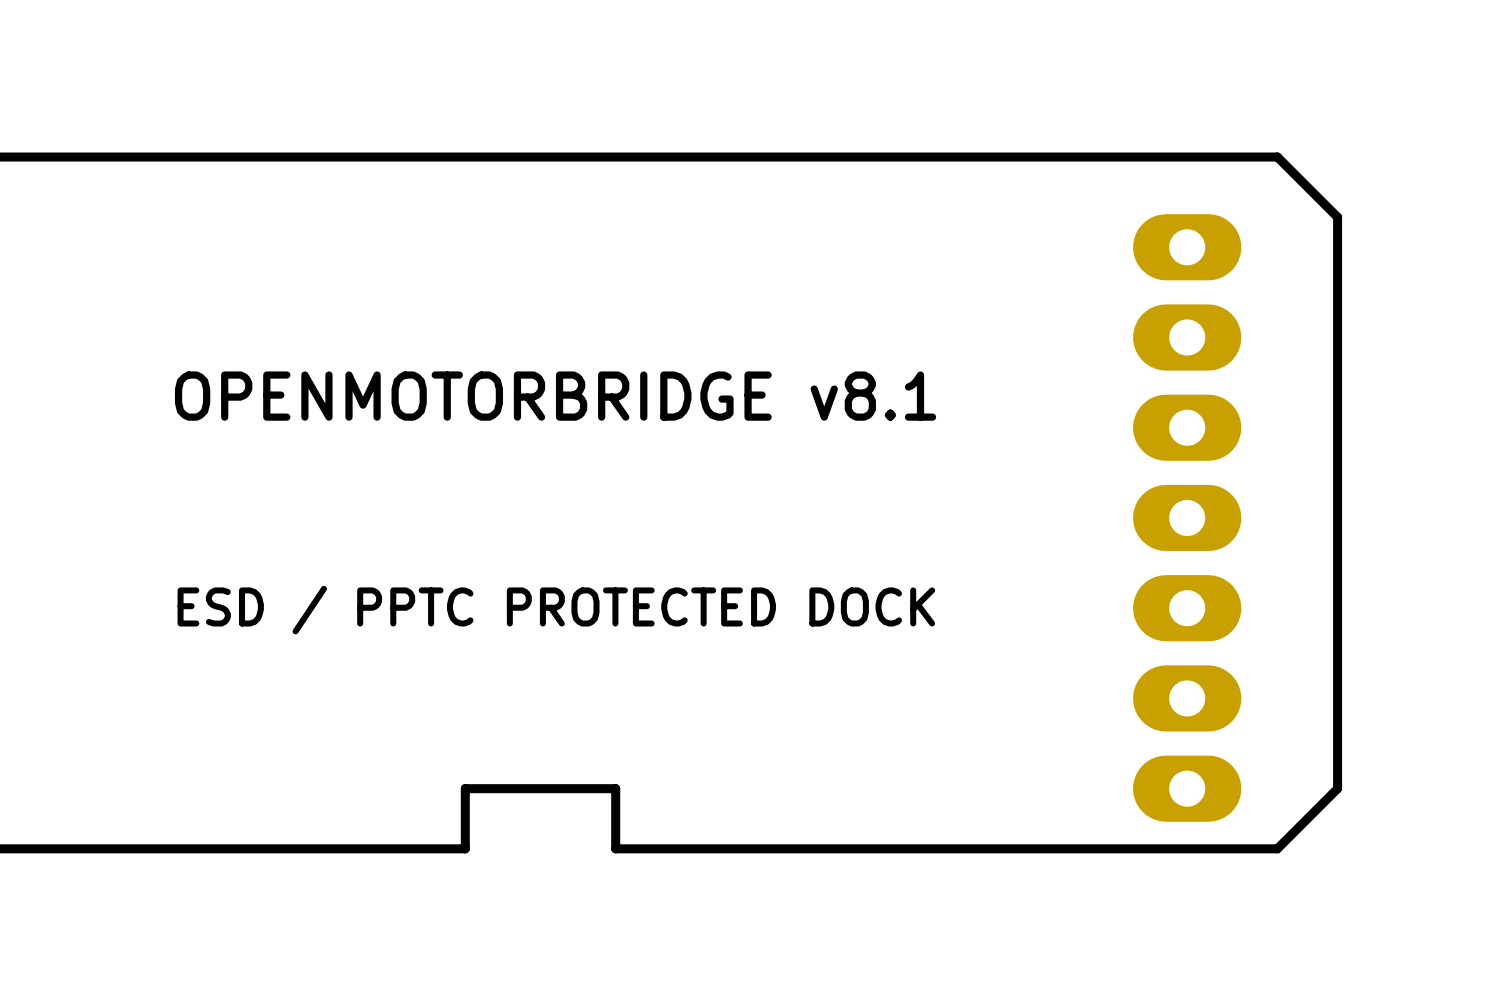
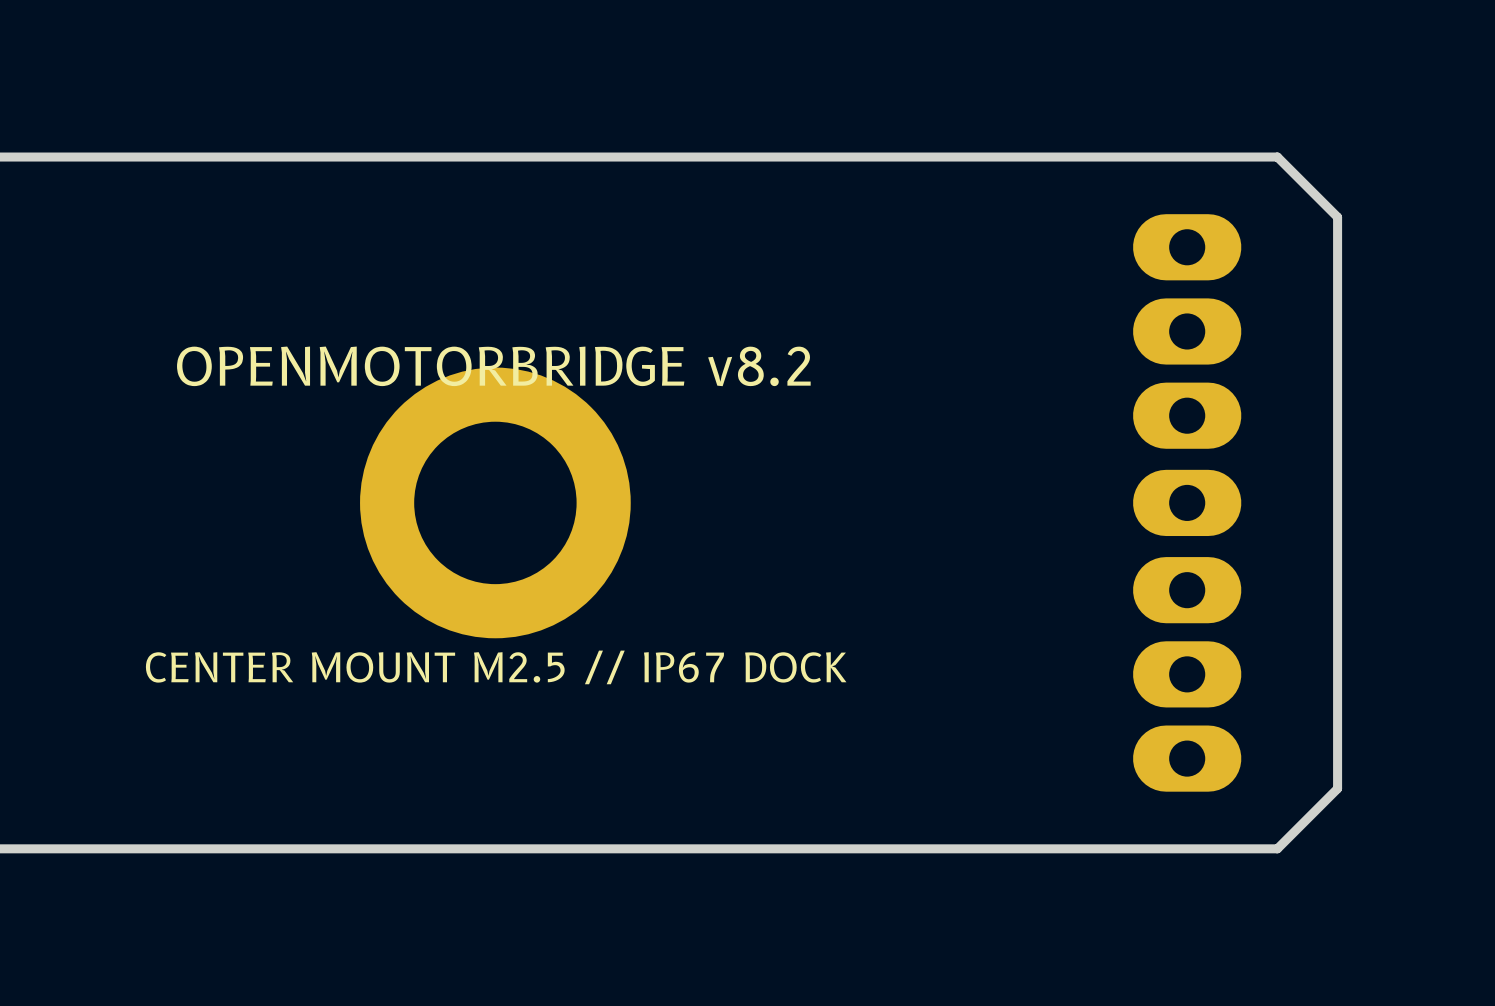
part footprint: [1133, 214, 1242, 822] -> [1133, 214, 1242, 792]
text: OPENMOTORBRIDGE v8.1 (555, 396) -> OPENMOTORBRIDGE v8.2 (493, 366)
part: none -> (495, 502)
text: ESD / PPTC PROTECTED DOCK (556, 610) -> none
text: none -> CENTER MOUNT M2.5 // IP67 DOCK (496, 667)
board edge: (615, 848) (615, 788) (465, 788) (465, 848) -> (615, 848) (465, 848)

